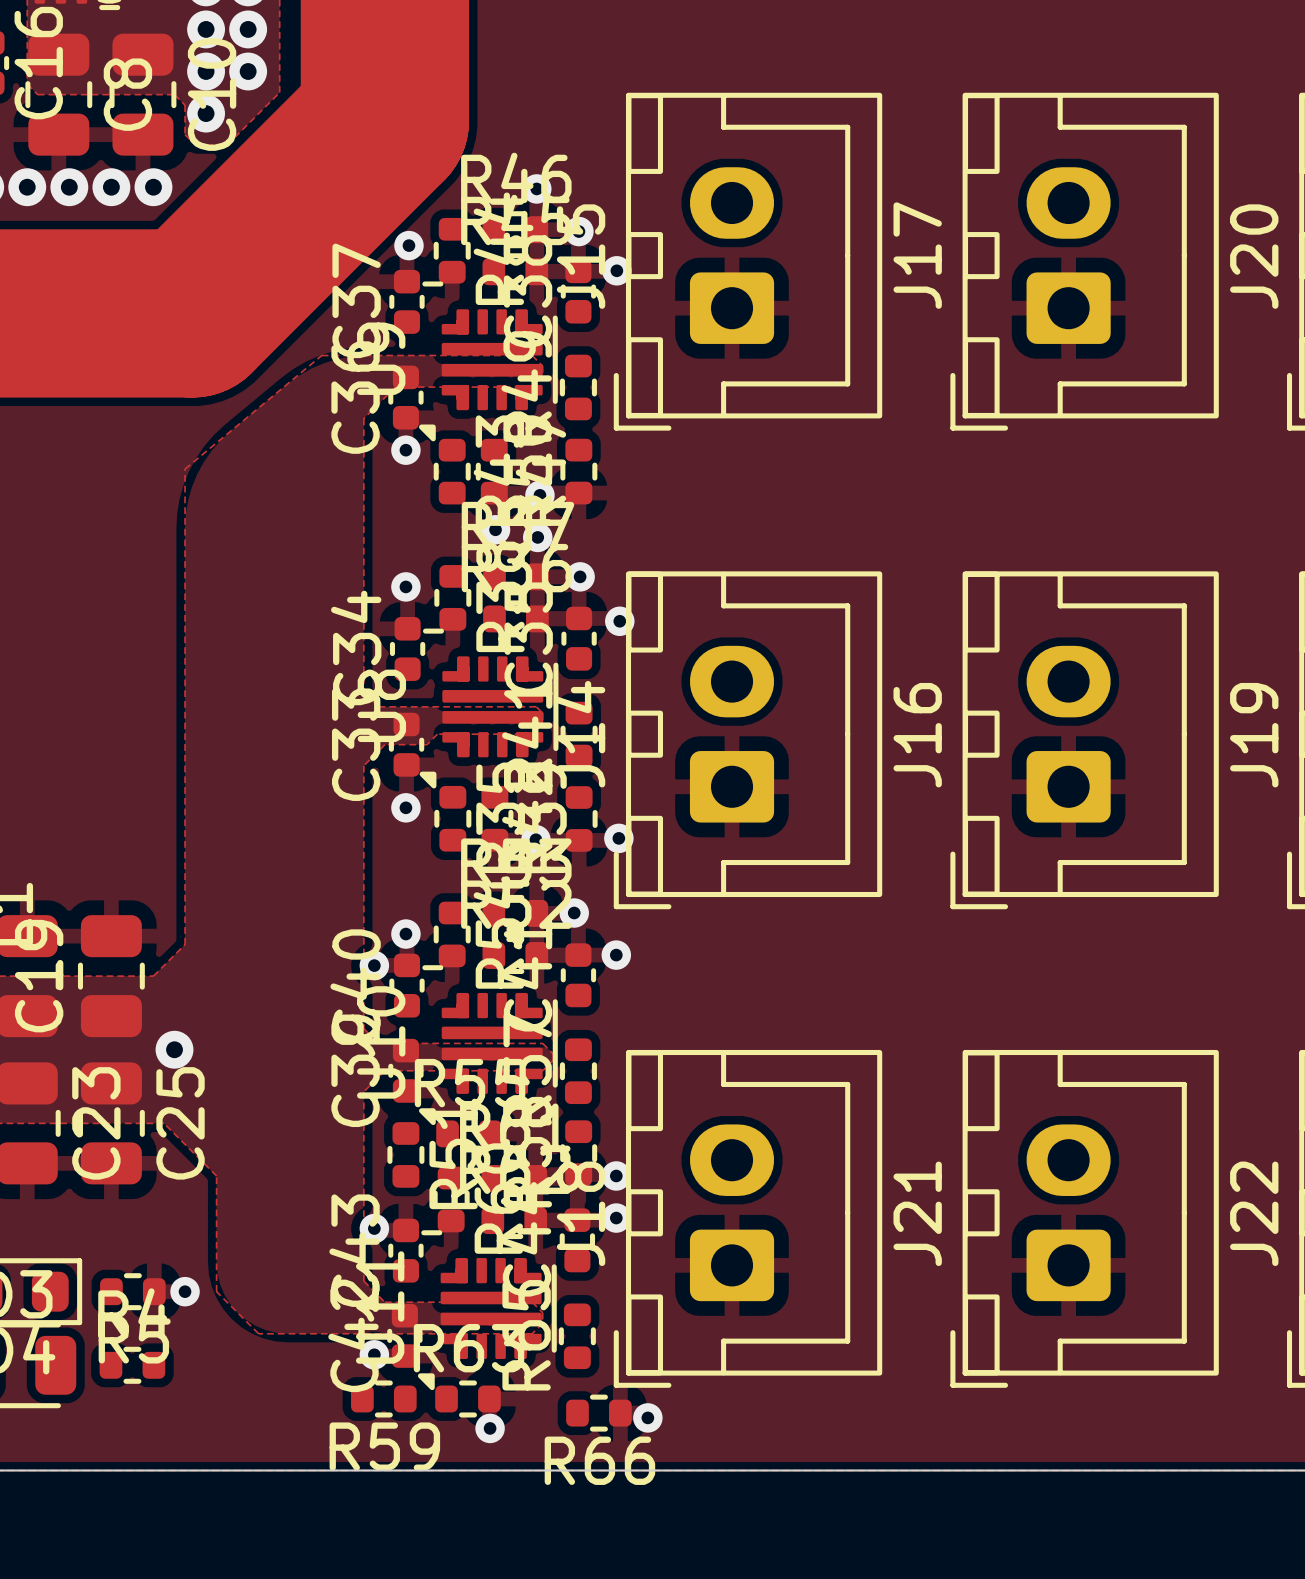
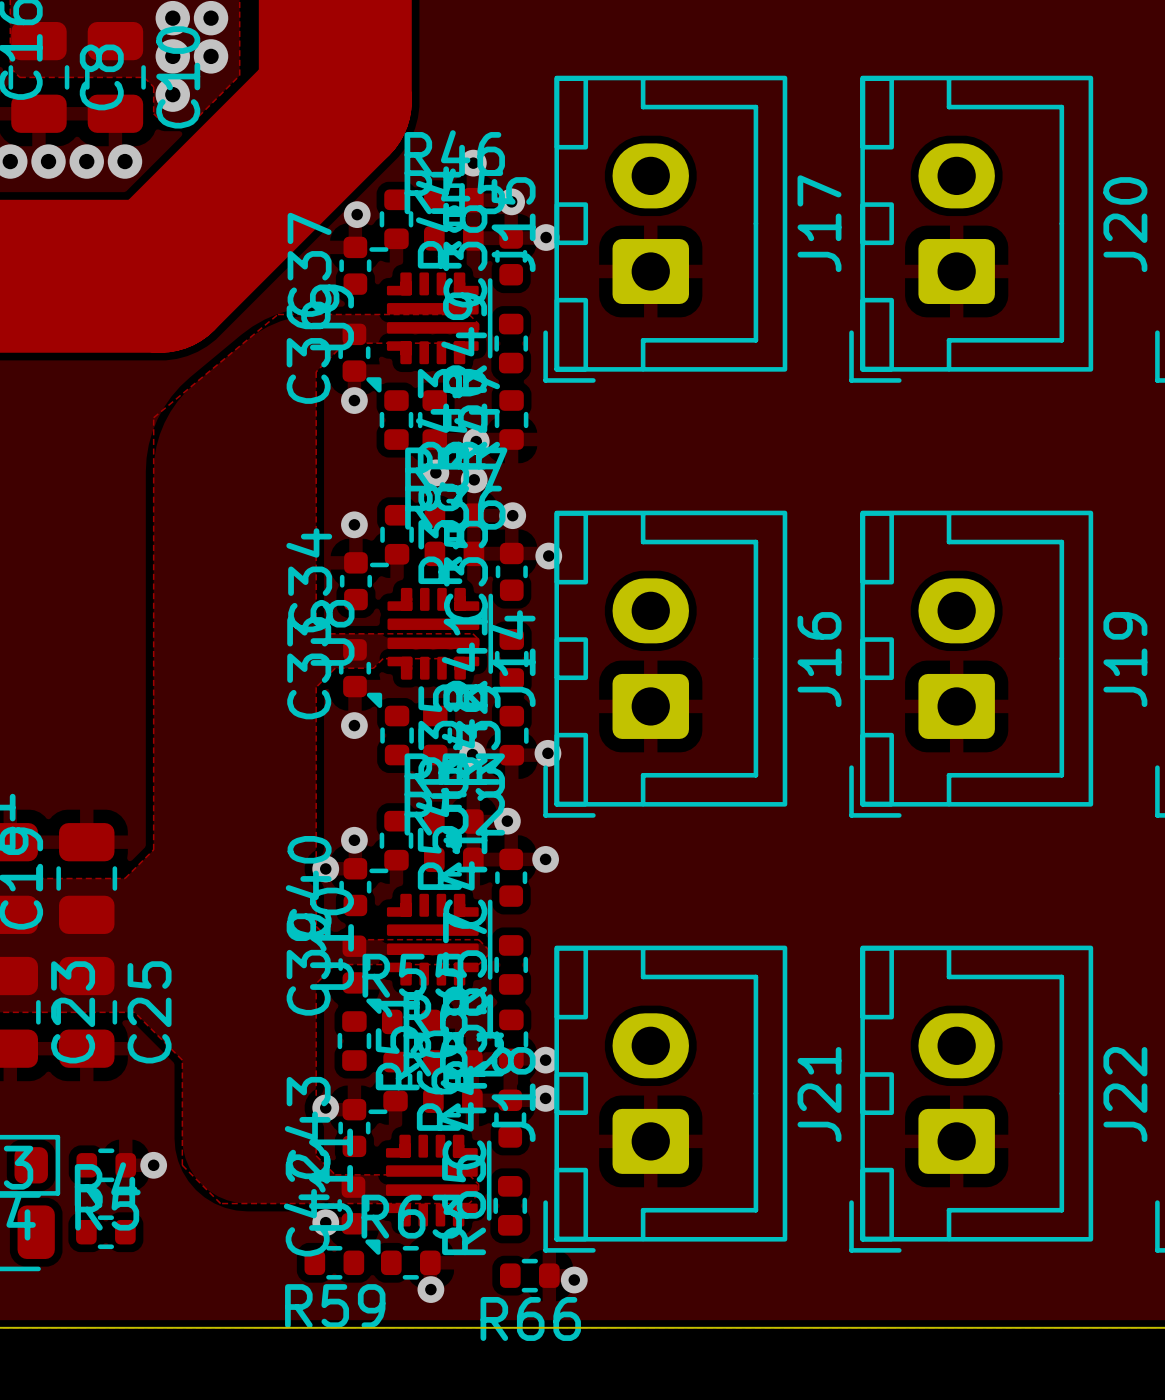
via: (174, 1049) -> none

